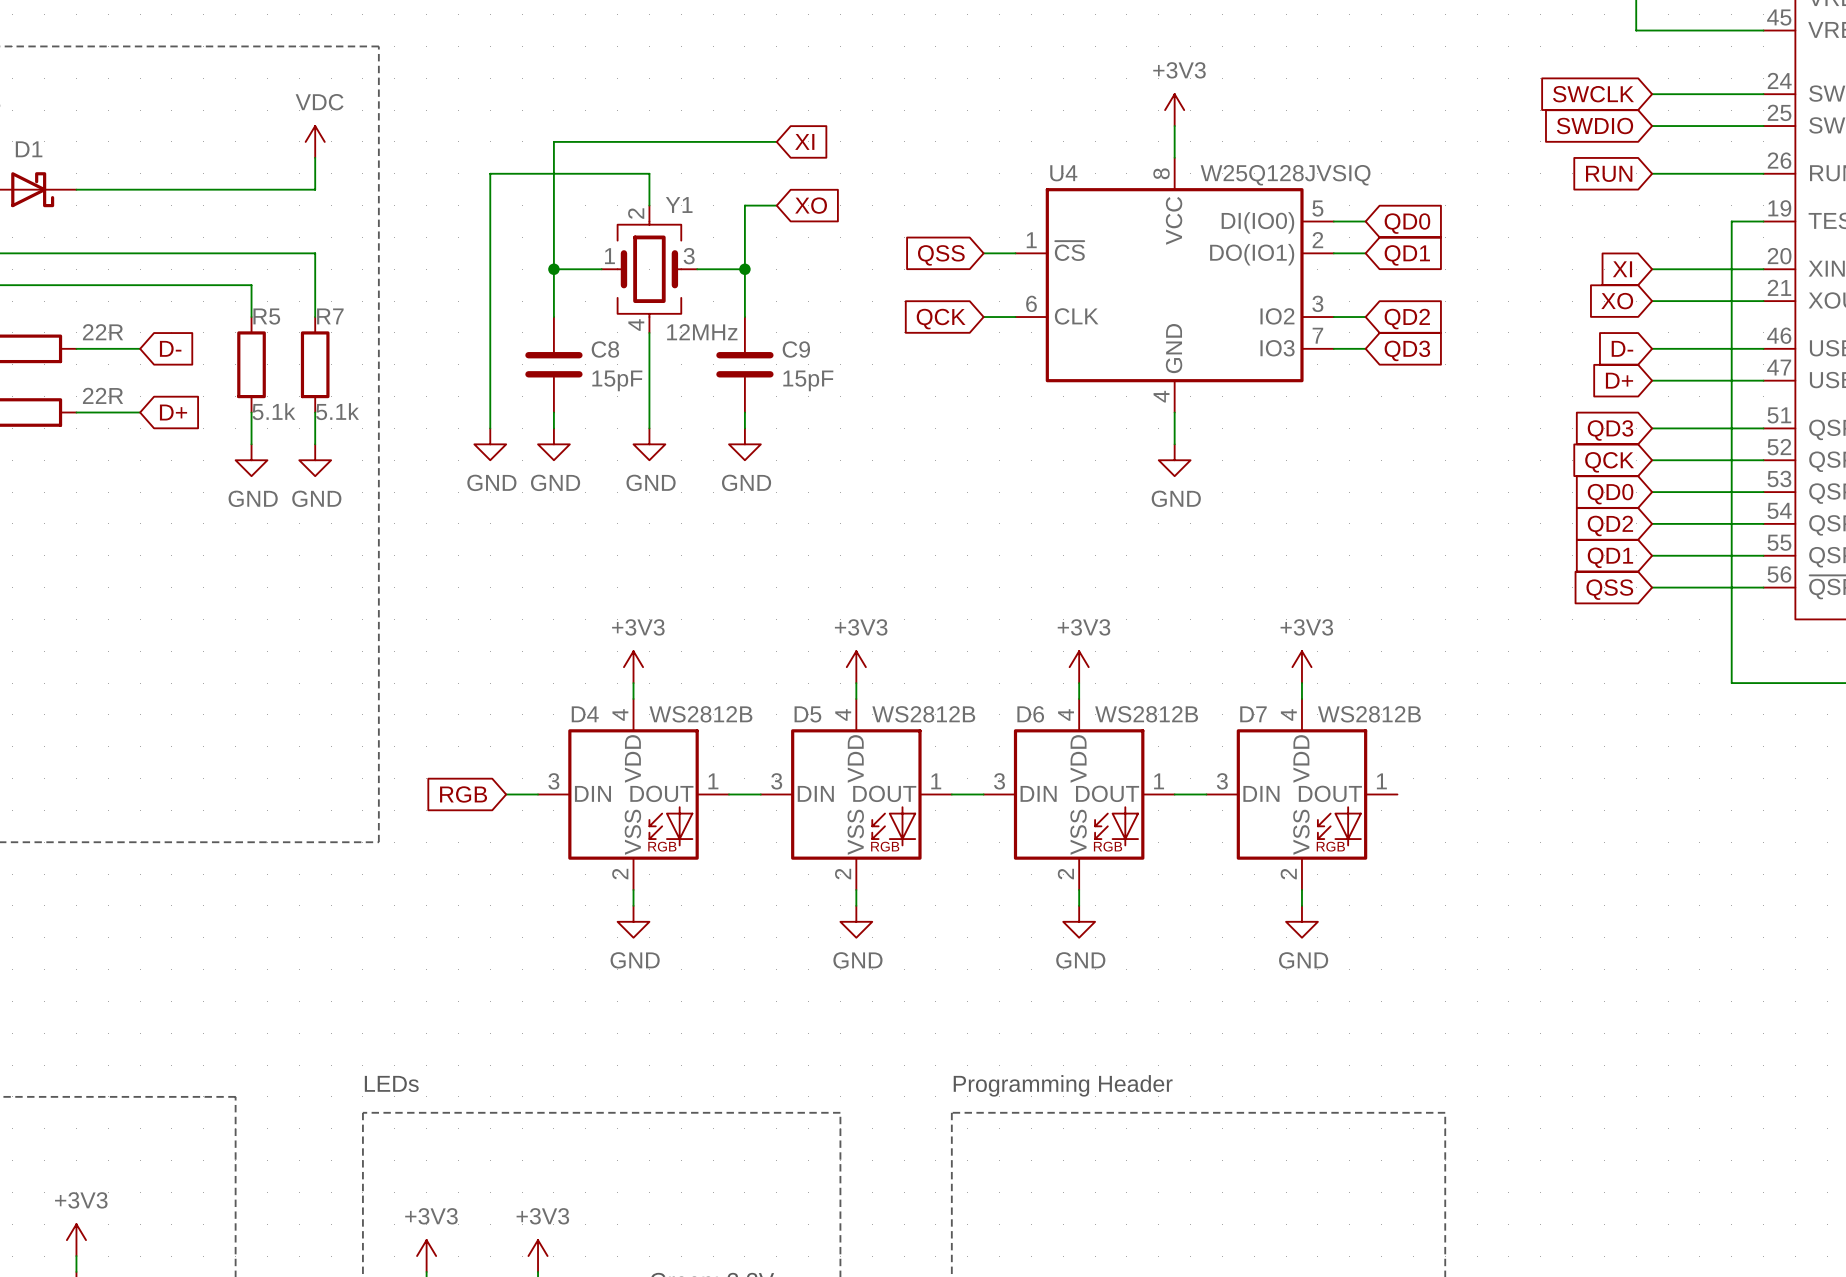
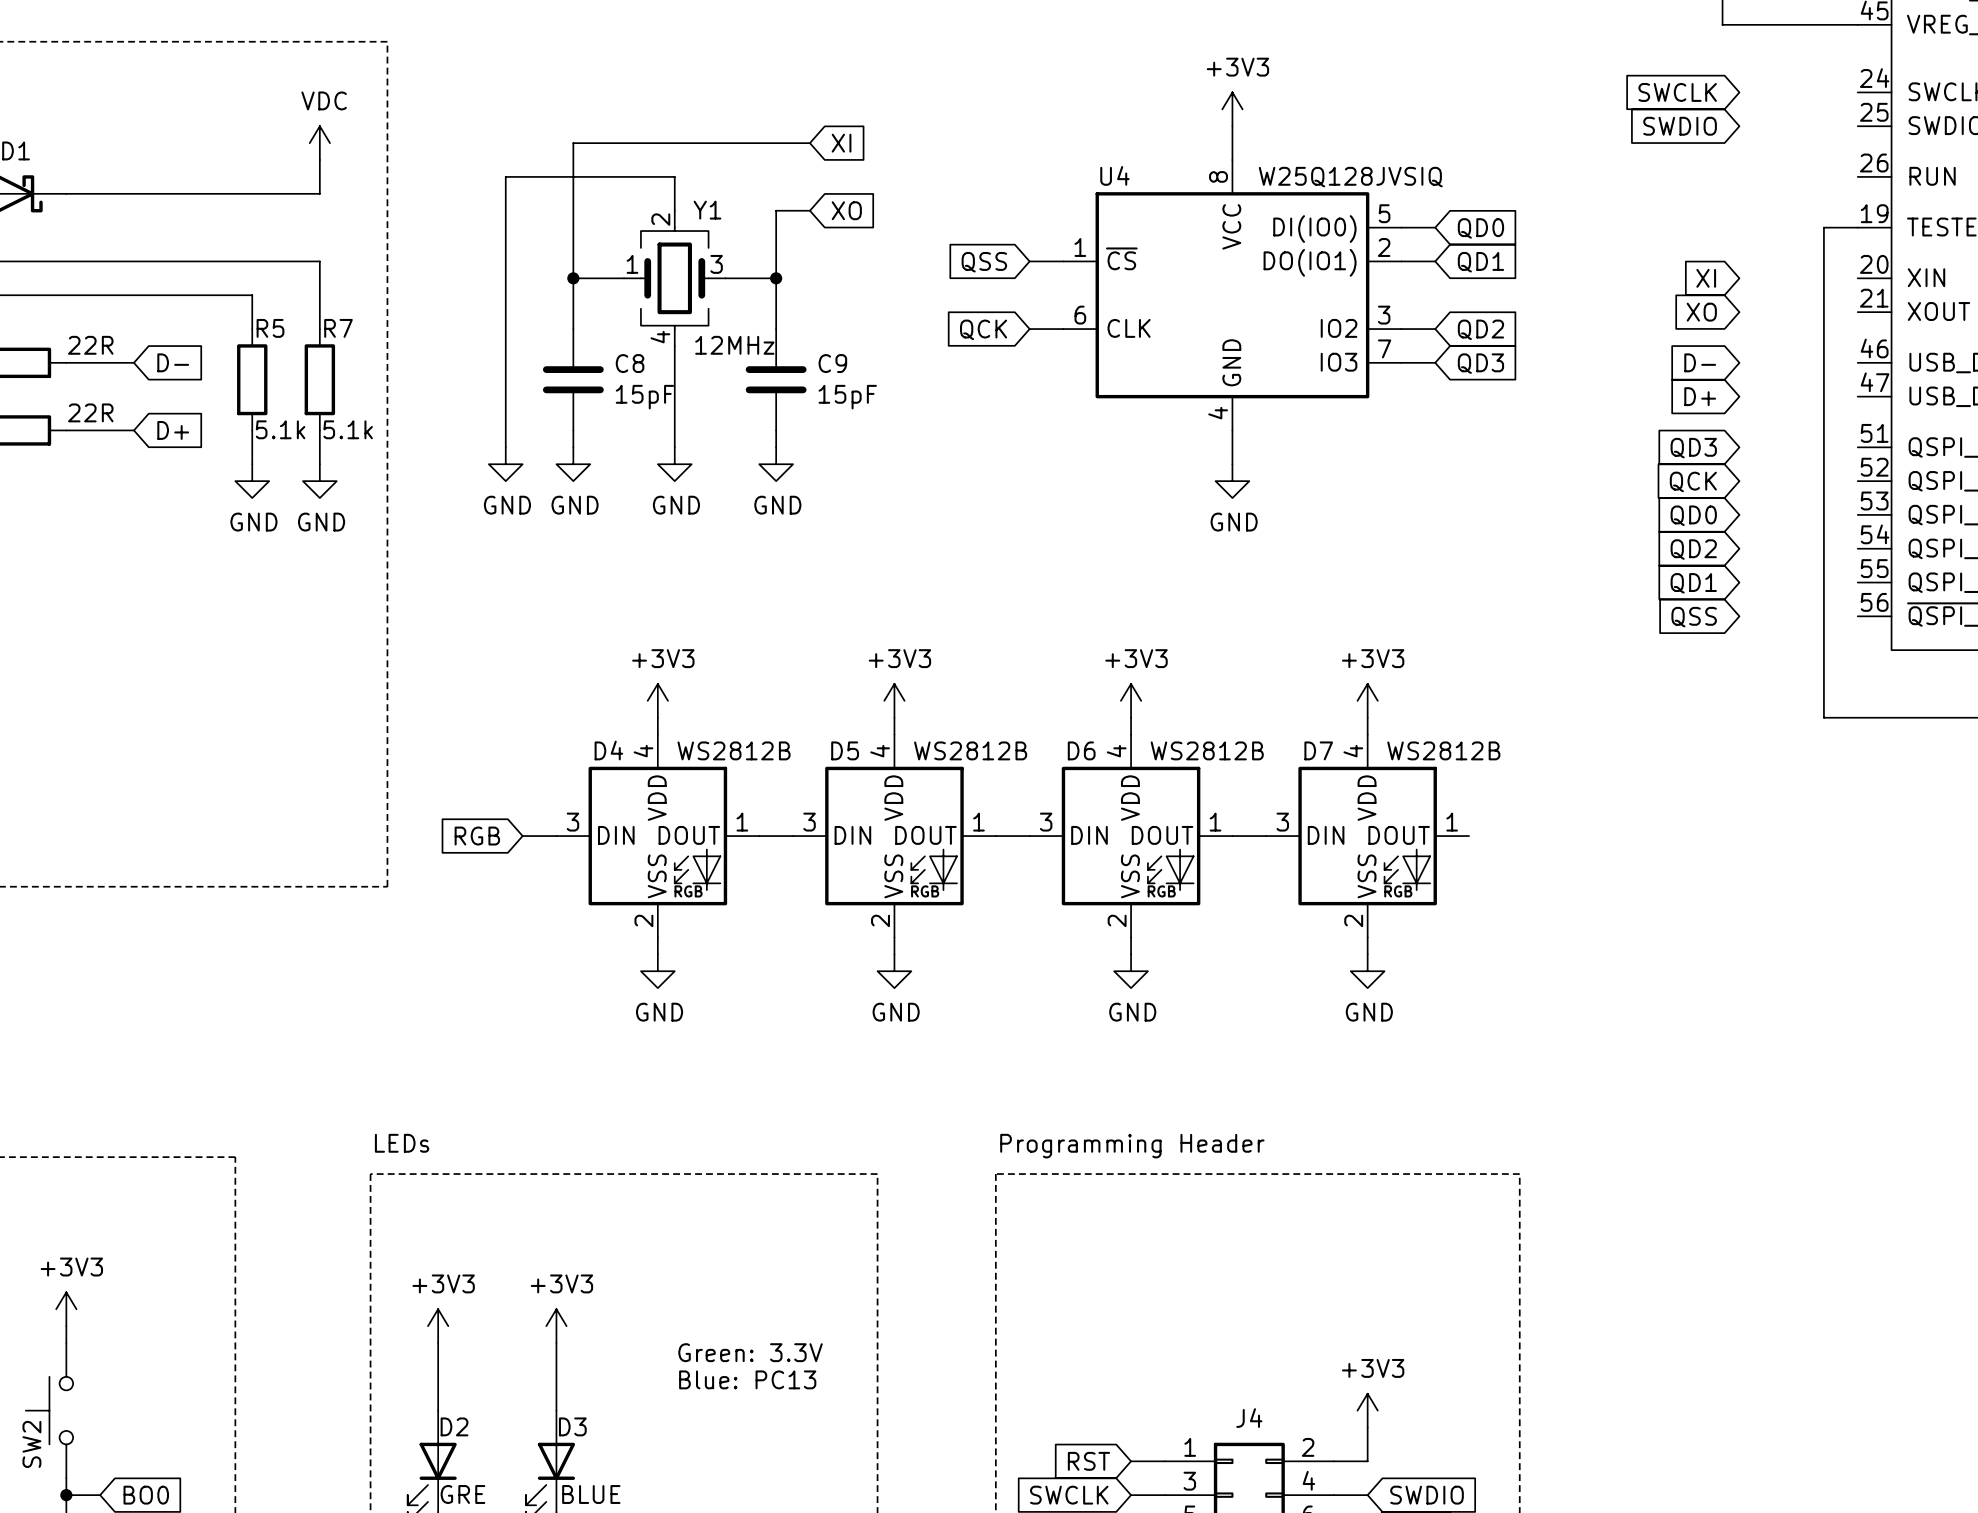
wire: (1652, 94) (1763, 94) -> none
wire: (1652, 126) (1763, 126) -> none
global label: RUN (1609, 173) -> none
wire: (1652, 173) (1763, 173) -> none
wire: (1652, 269) (1763, 269) -> none
wire: (1652, 301) (1763, 301) -> none
wire: (1652, 348) (1763, 348) -> none
wire: (1652, 380) (1763, 380) -> none
wire: (1652, 428) (1763, 428) -> none
wire: (1652, 460) (1763, 460) -> none
wire: (1652, 492) (1763, 492) -> none
wire: (1652, 523) (1763, 523) -> none
wire: (1652, 555) (1763, 555) -> none
wire: (1652, 587) (1763, 587) -> none

